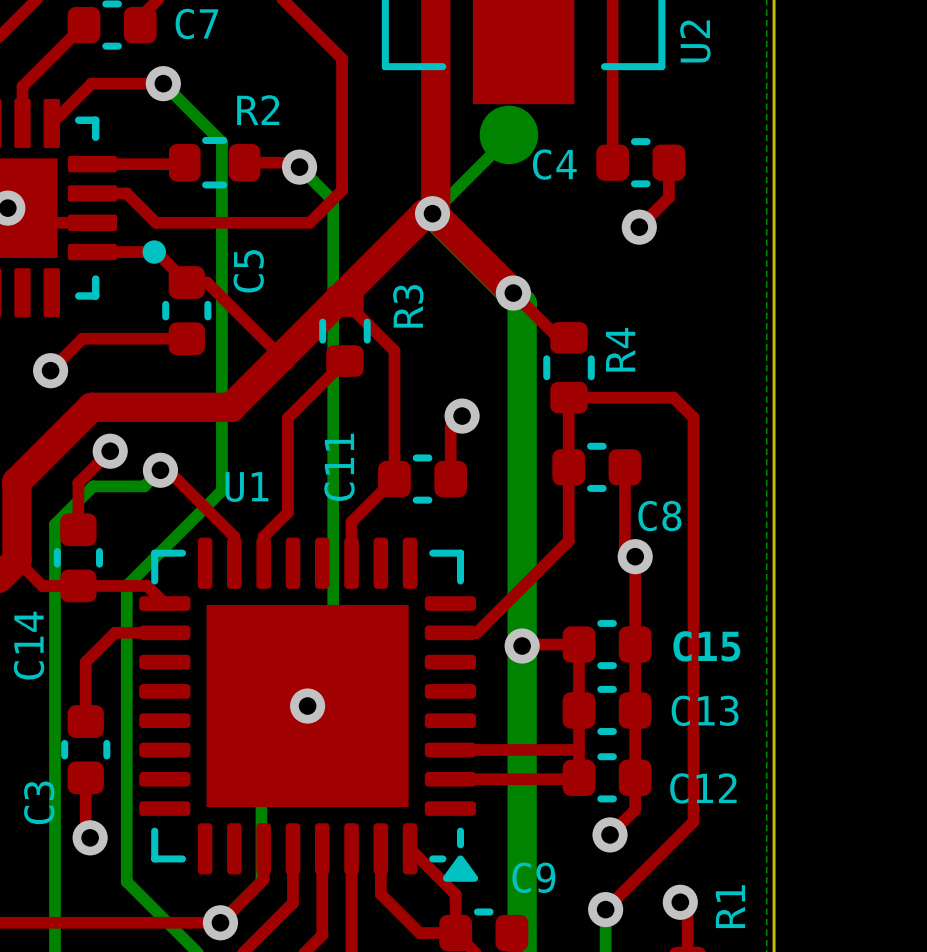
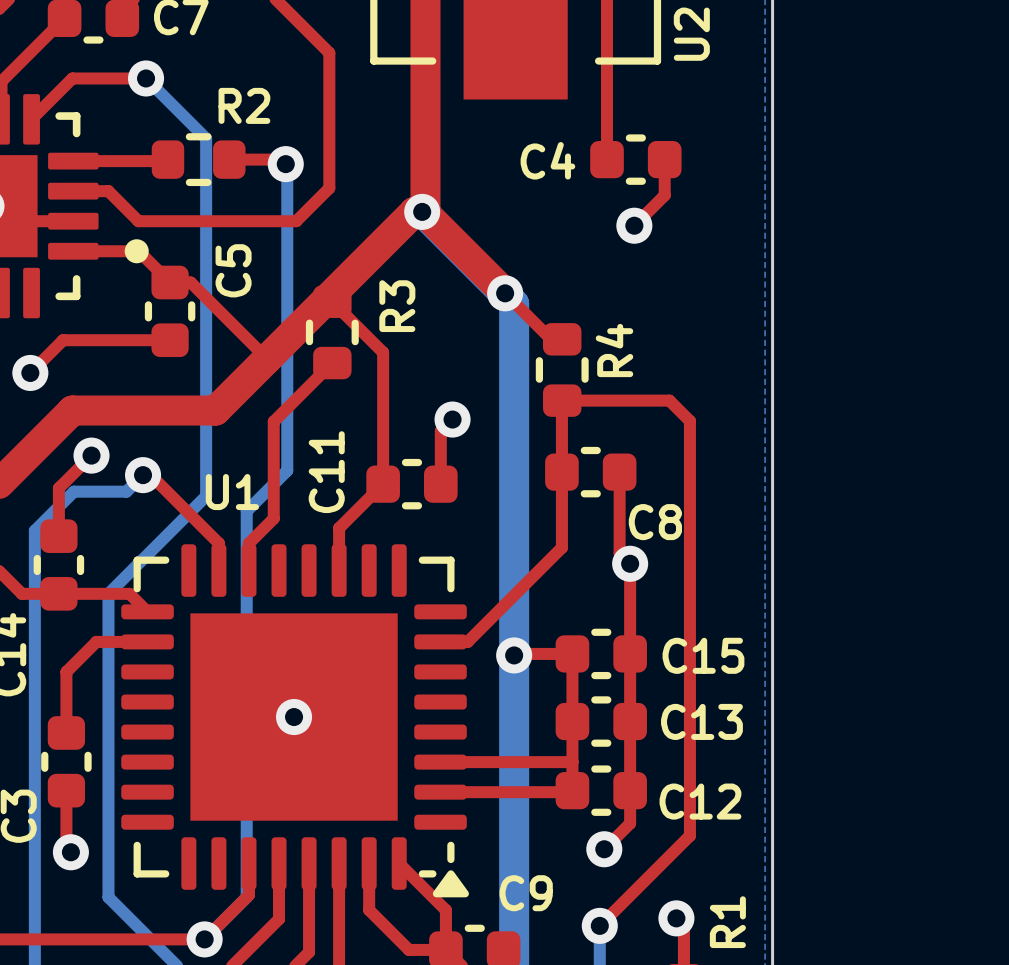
bottom track: (508, 134) (508, 137) (432, 213) -> none
part: (508, 134) -> none
bottom track: (301, 168) (333, 200) (333, 619) (261, 691) -> (287, 165) (287, 470) (246, 511) (246, 702)

